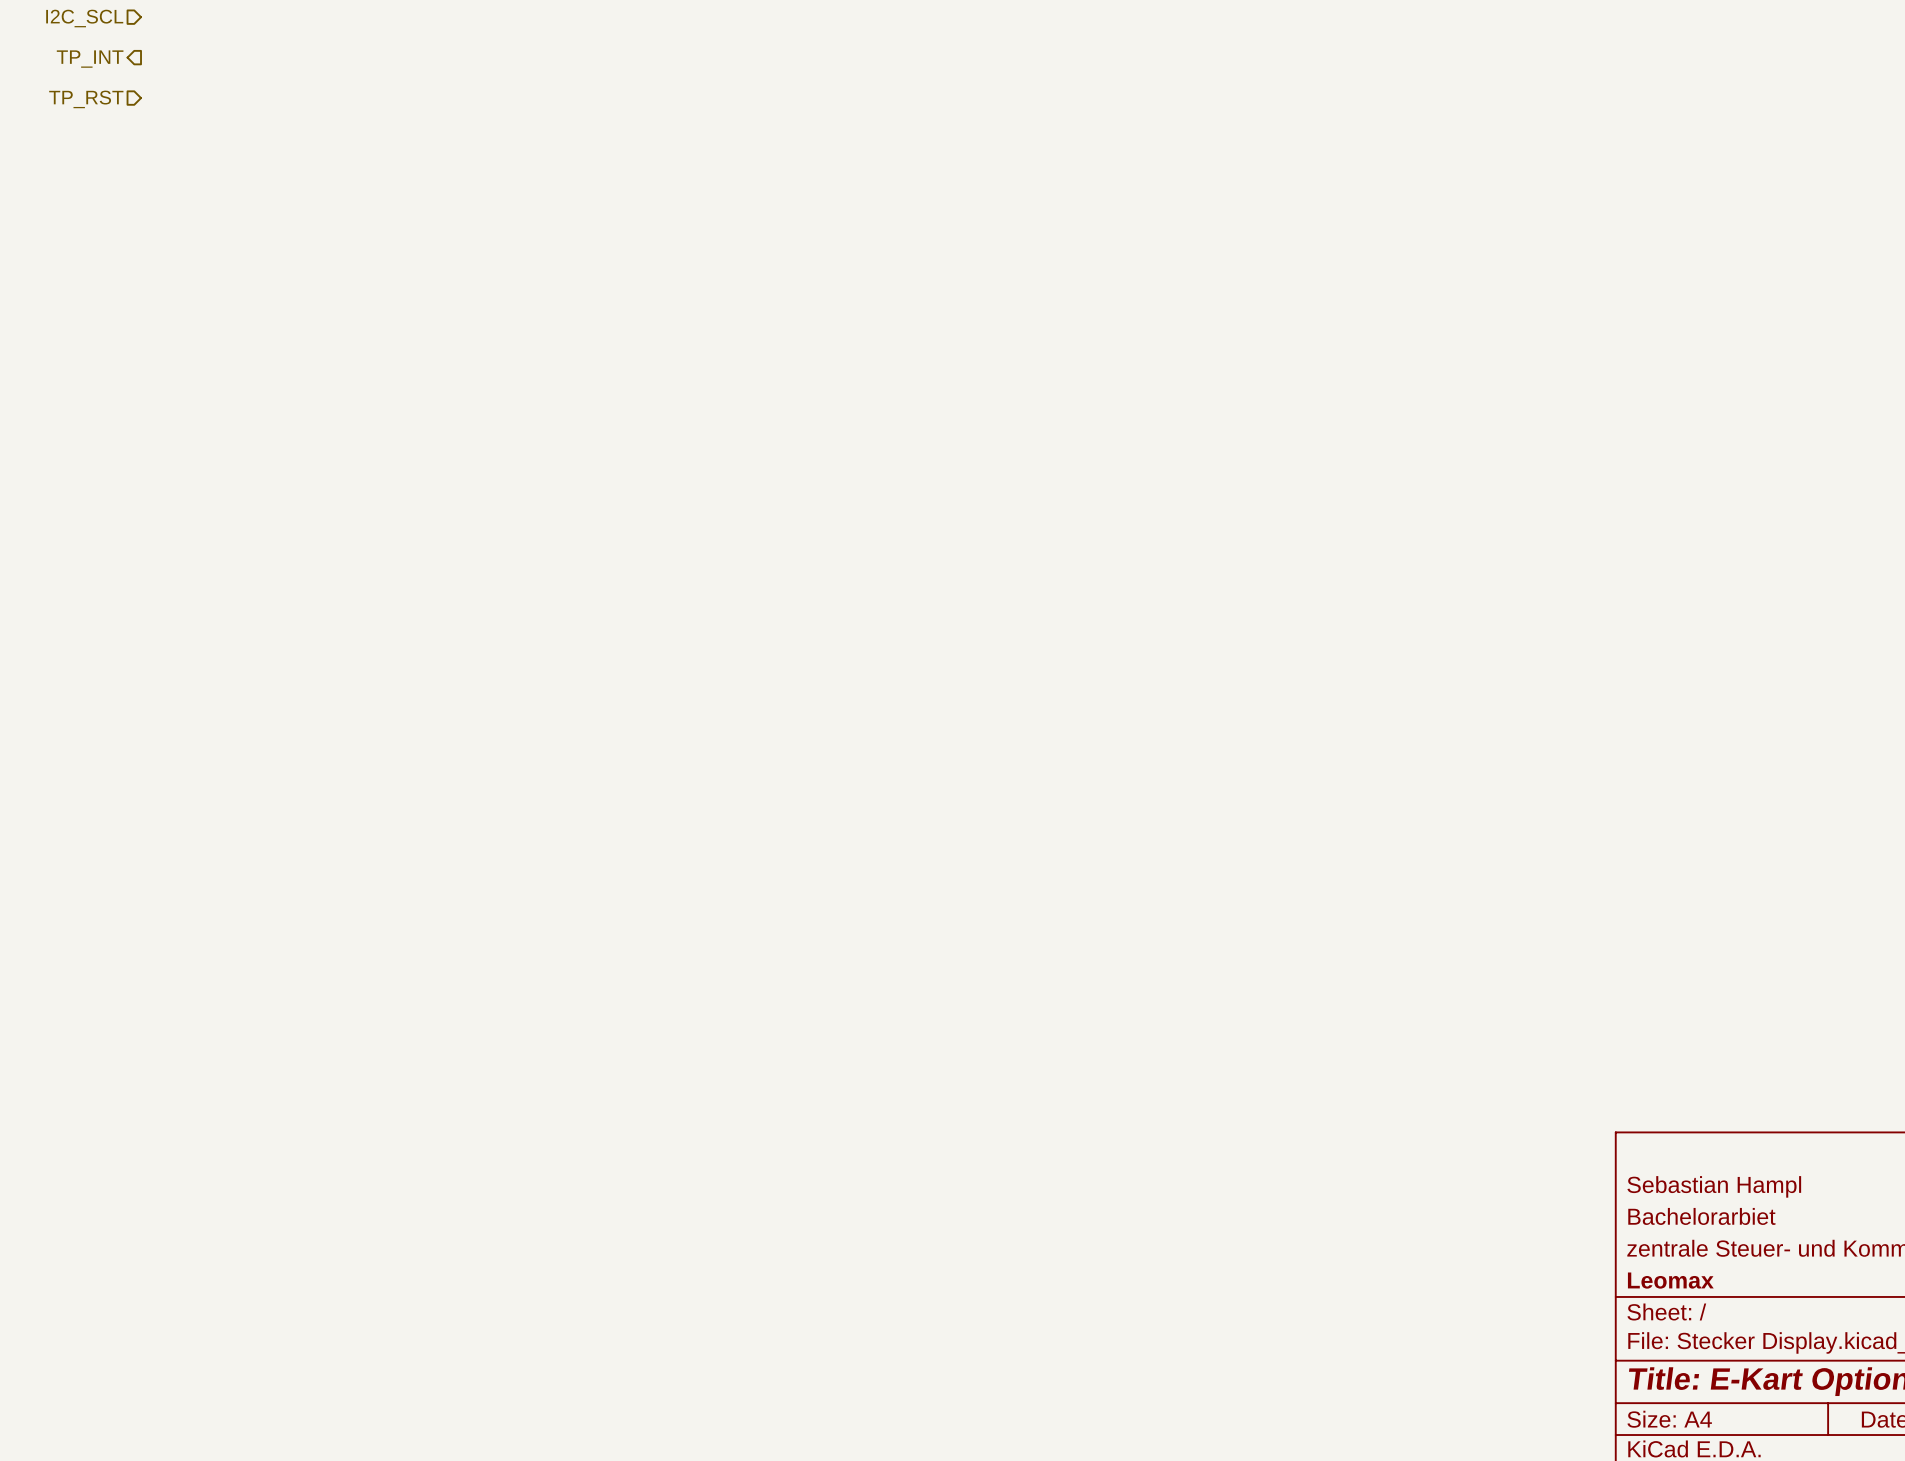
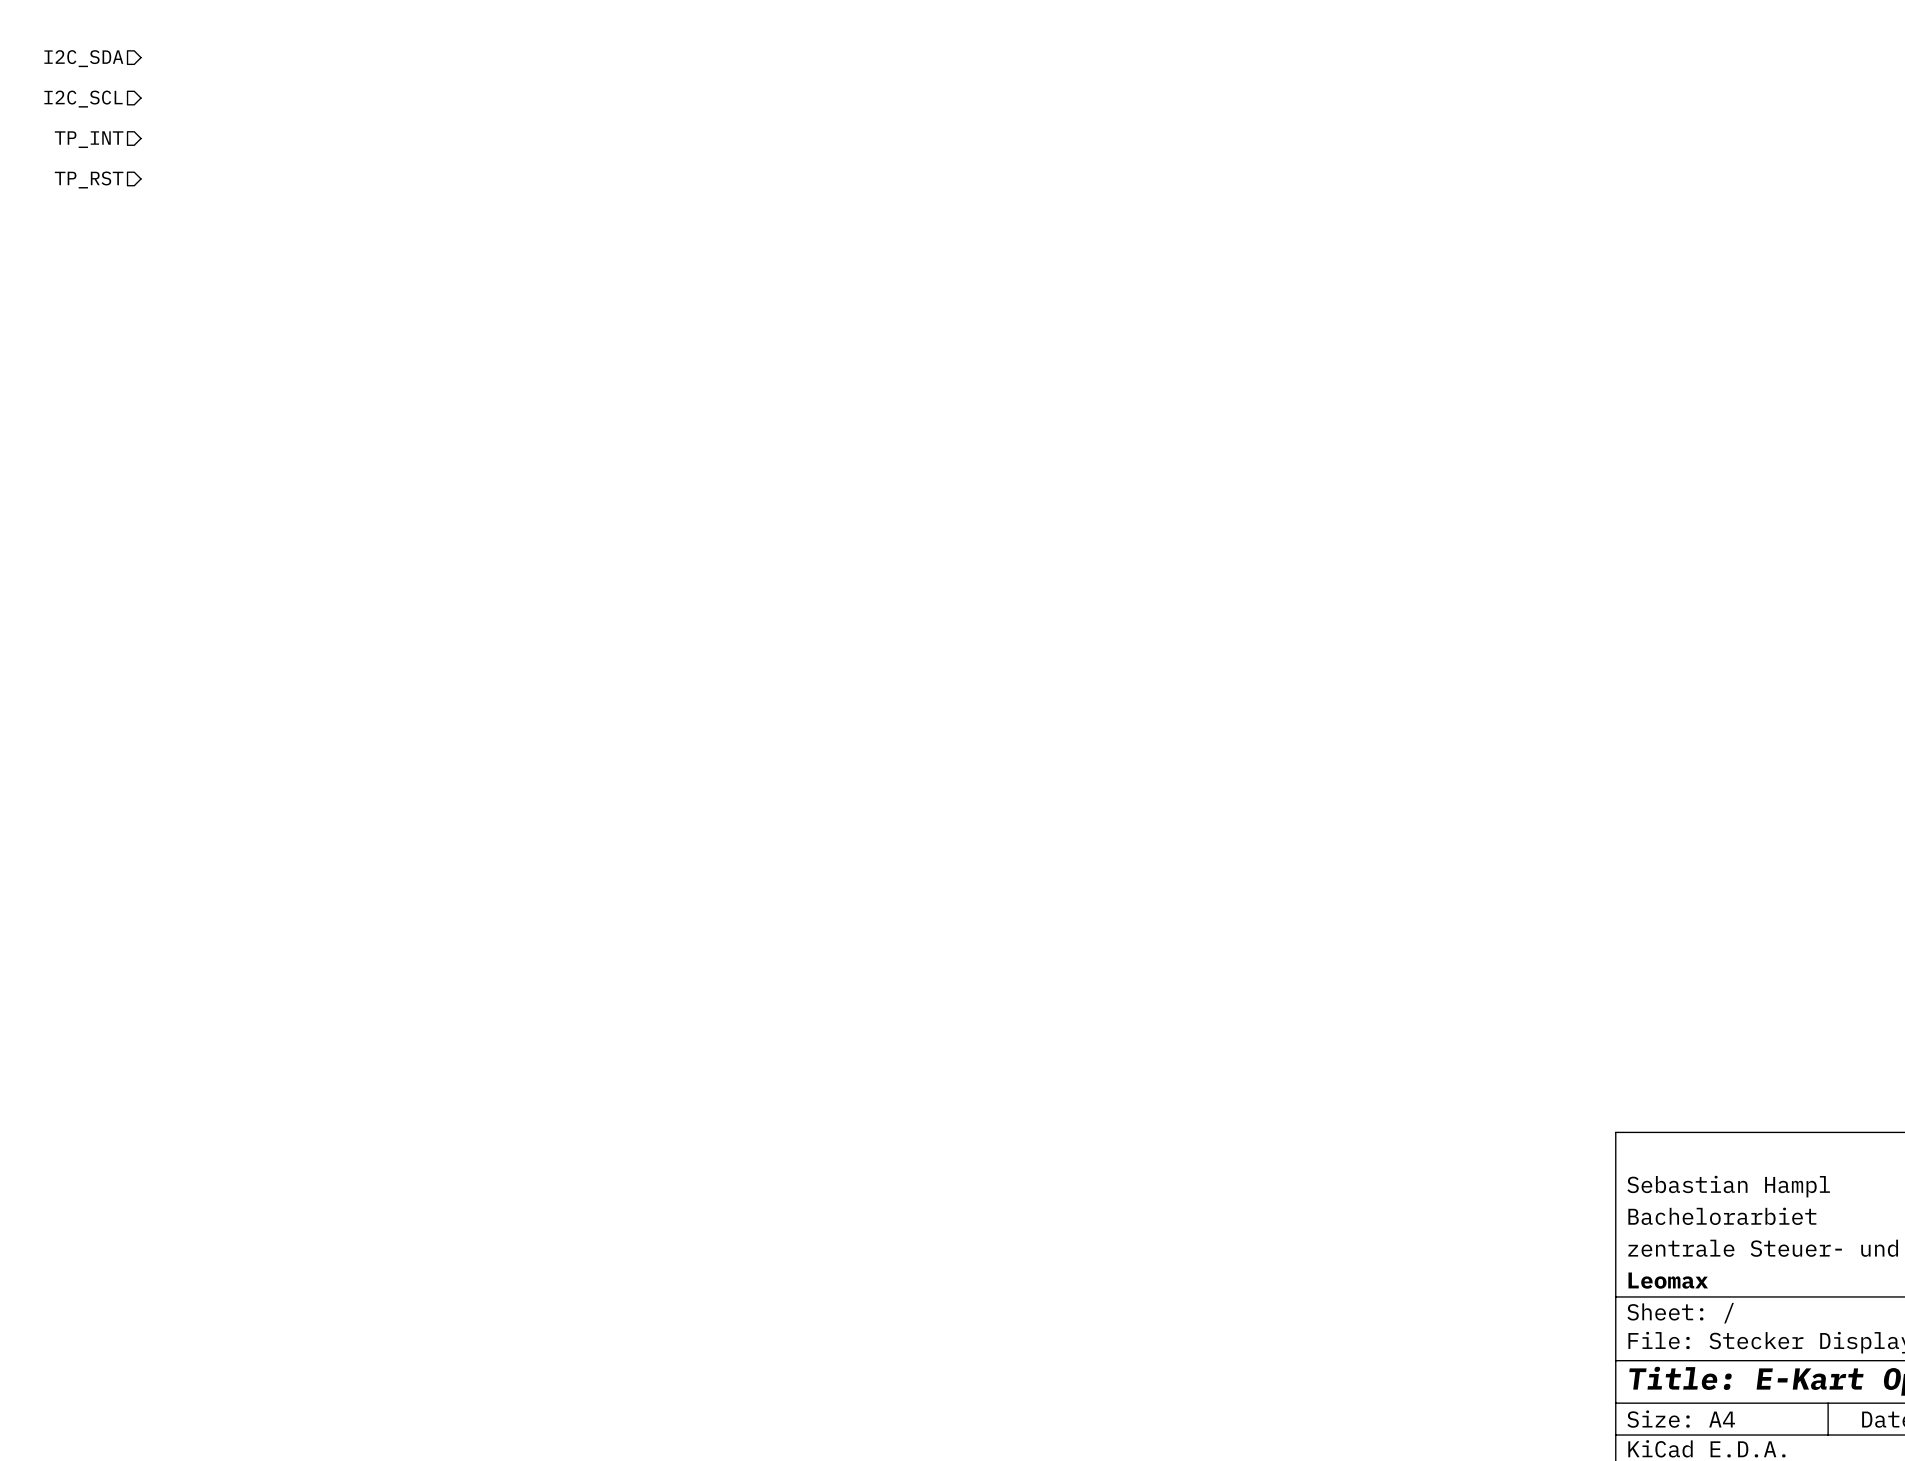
hierarchical label: I2C_SCL (84, 18) -> none
hierarchical label shape: output (90, 59) -> input (83, 58)
hierarchical label: TP_INT (90, 59) -> I2C_SDA (83, 58)
hierarchical label: TP_RST (86, 99) -> I2C_SCL (83, 99)
hierarchical label: none -> TP_INT (89, 139)
hierarchical label: none -> TP_RST (89, 179)

